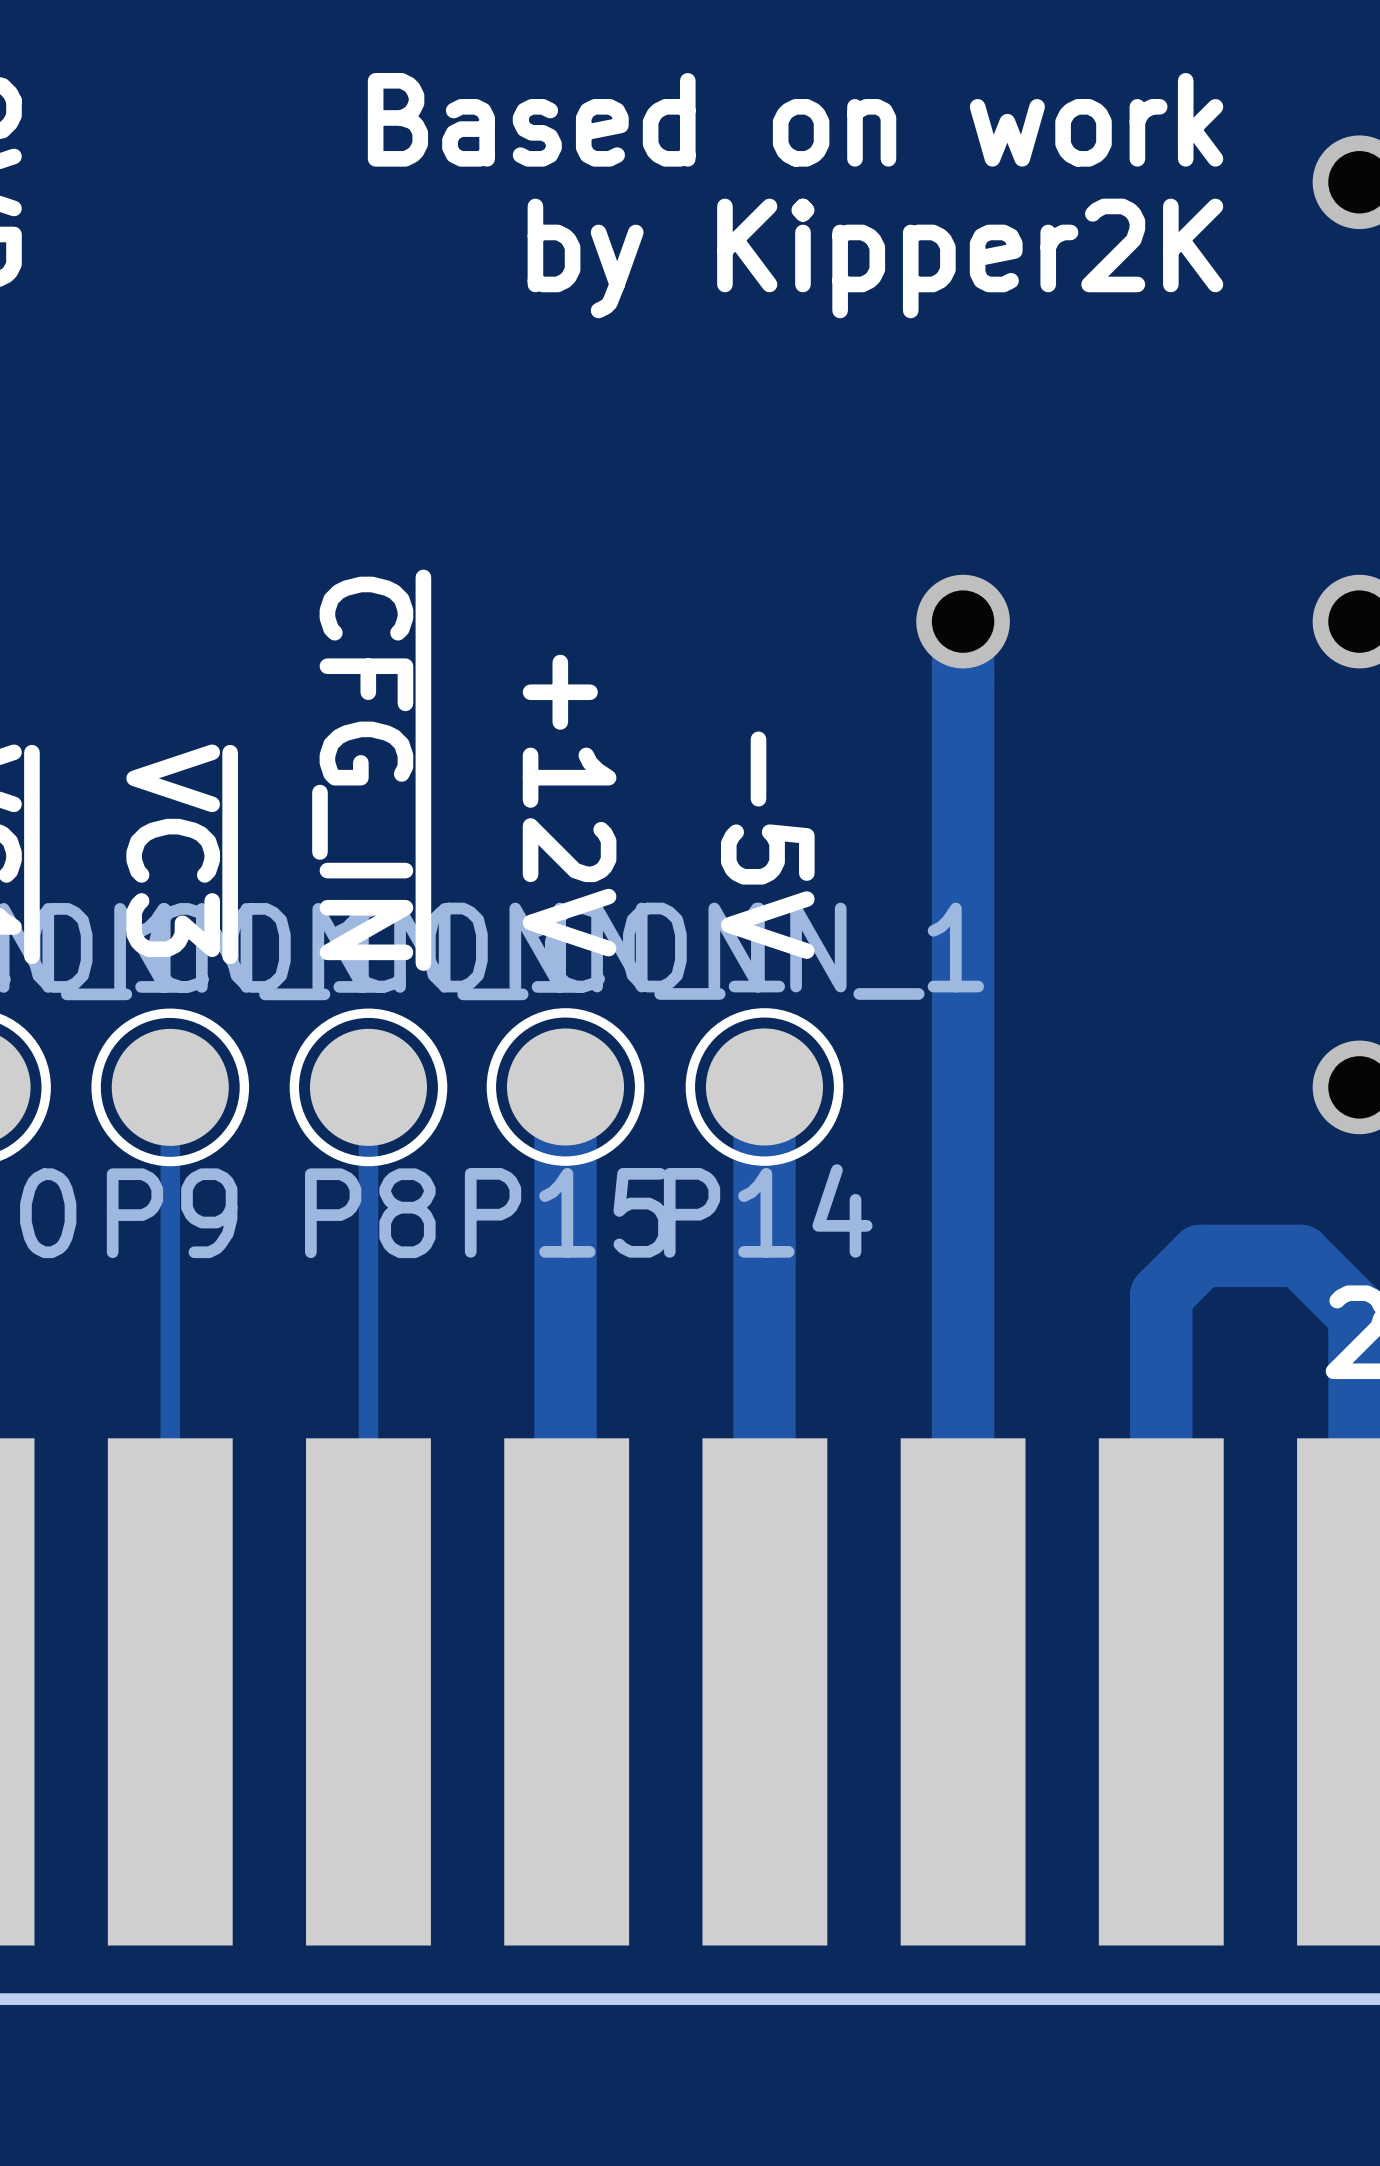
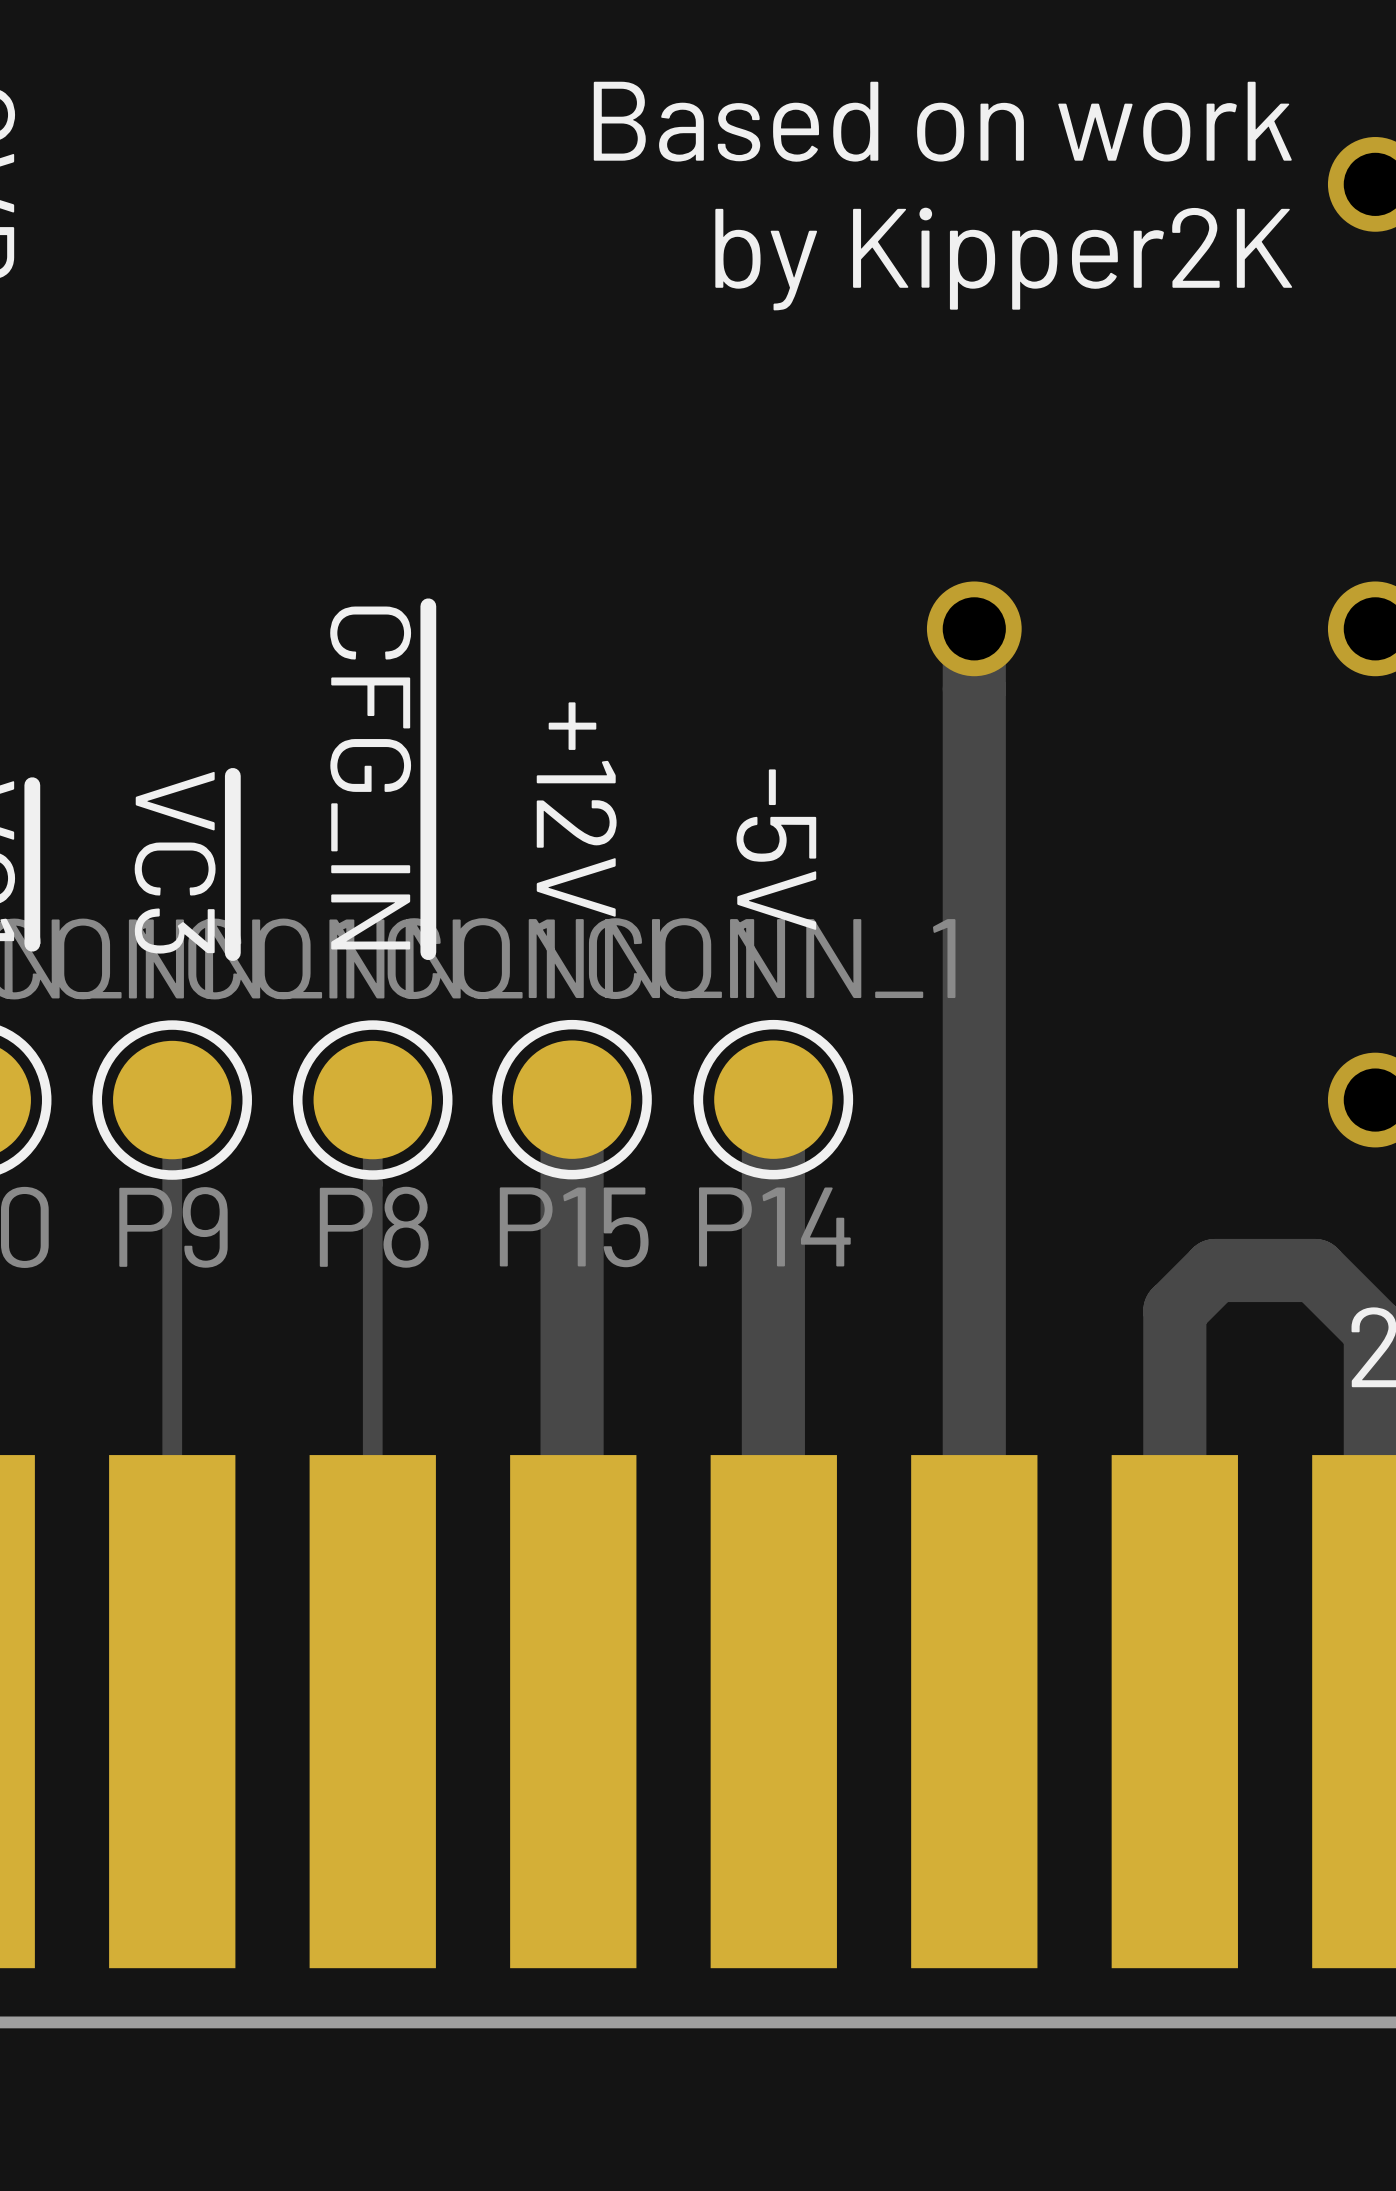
text position: Based on work (795, 119) -> Based on work (942, 121)
text position: by Kipper2K (875, 258) -> by Kipper2K (1003, 259)

